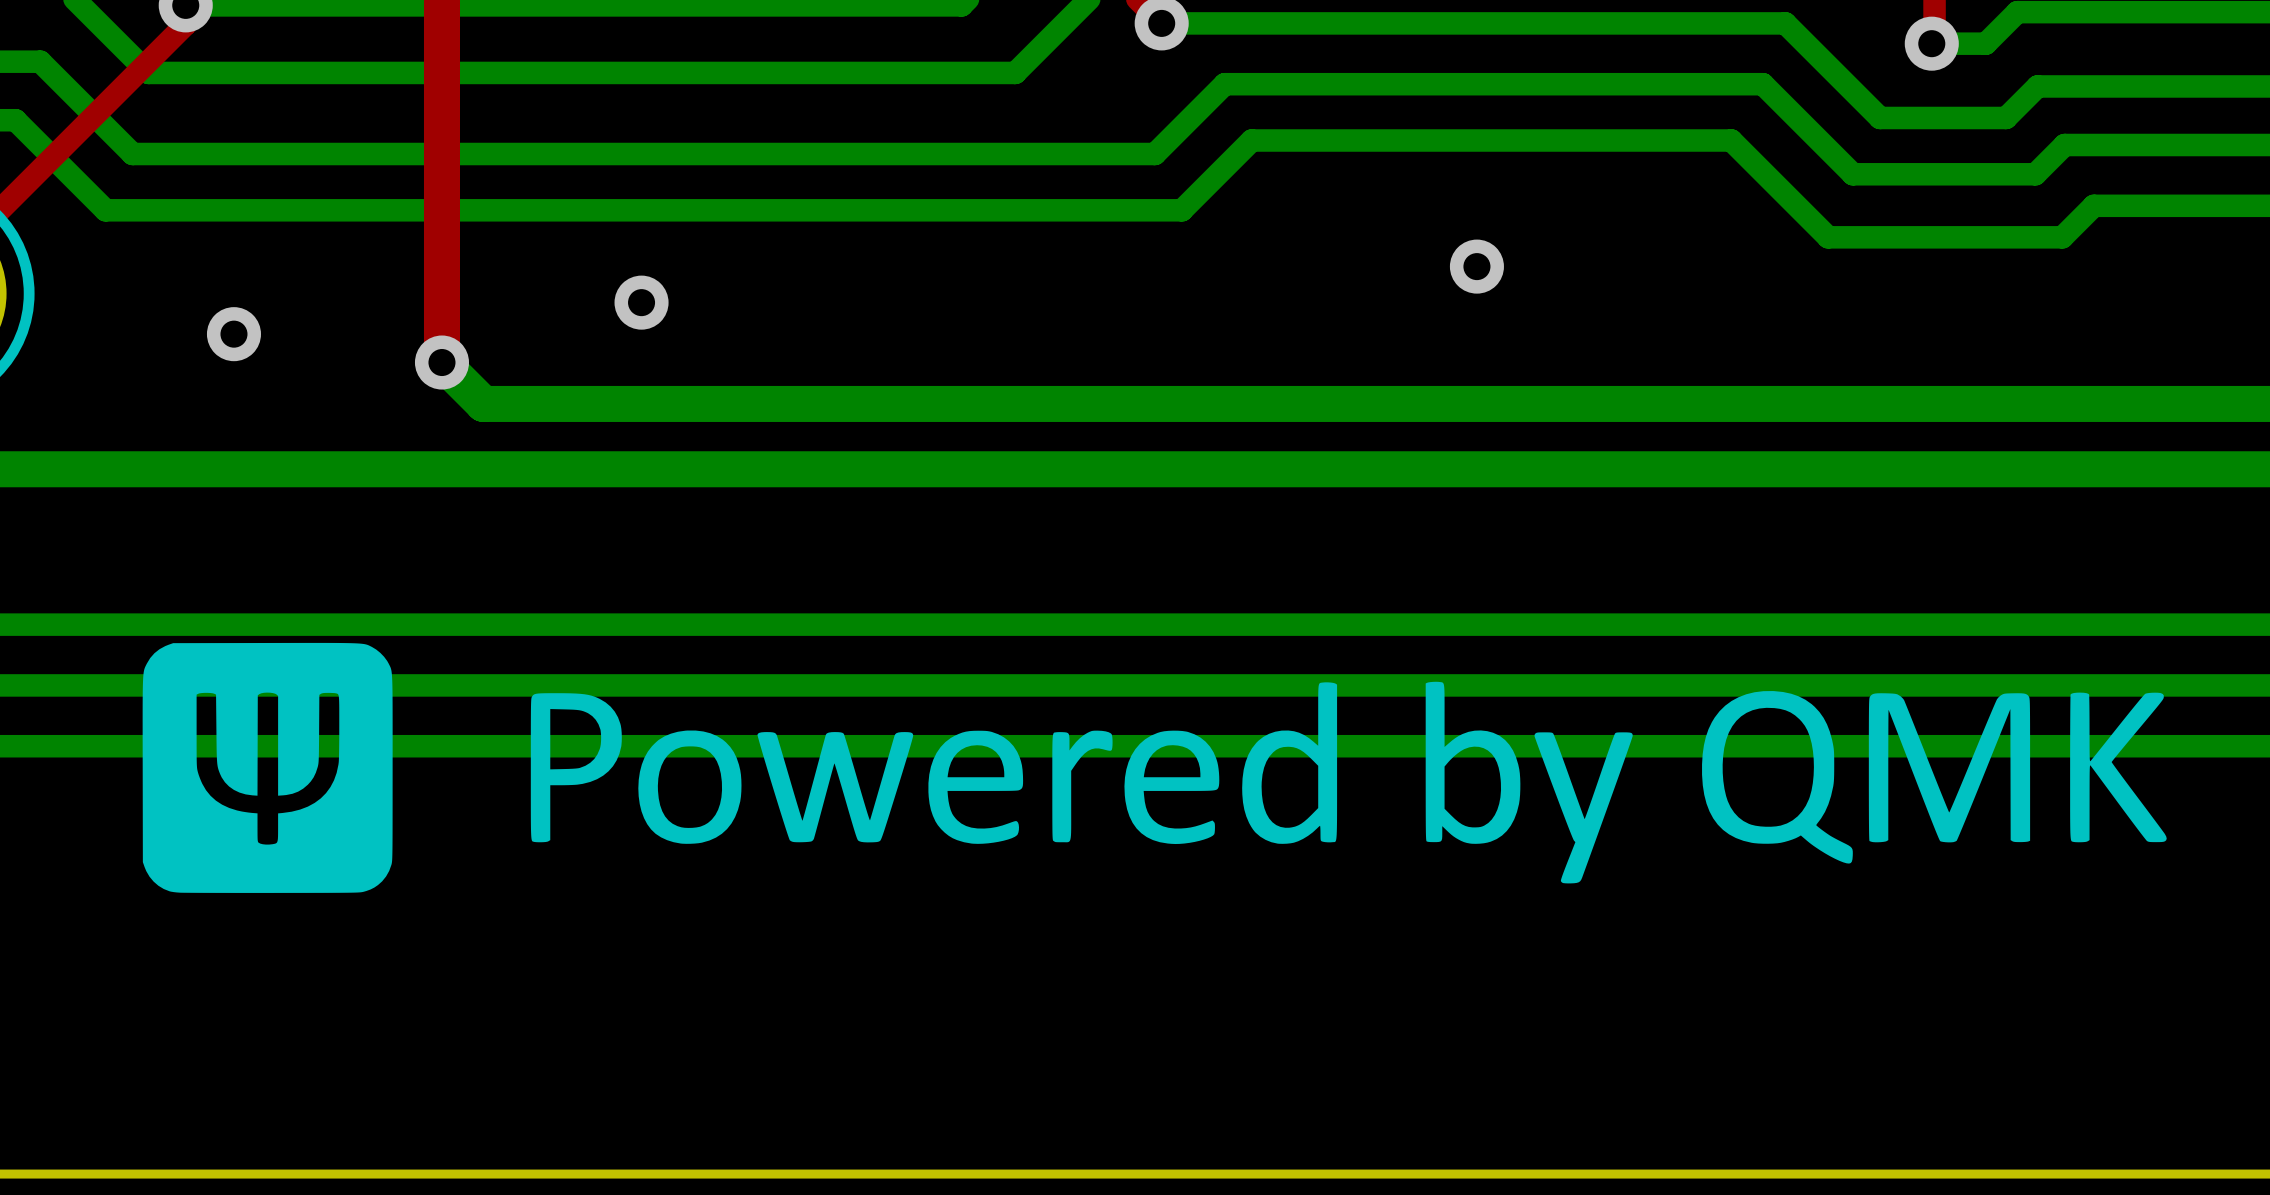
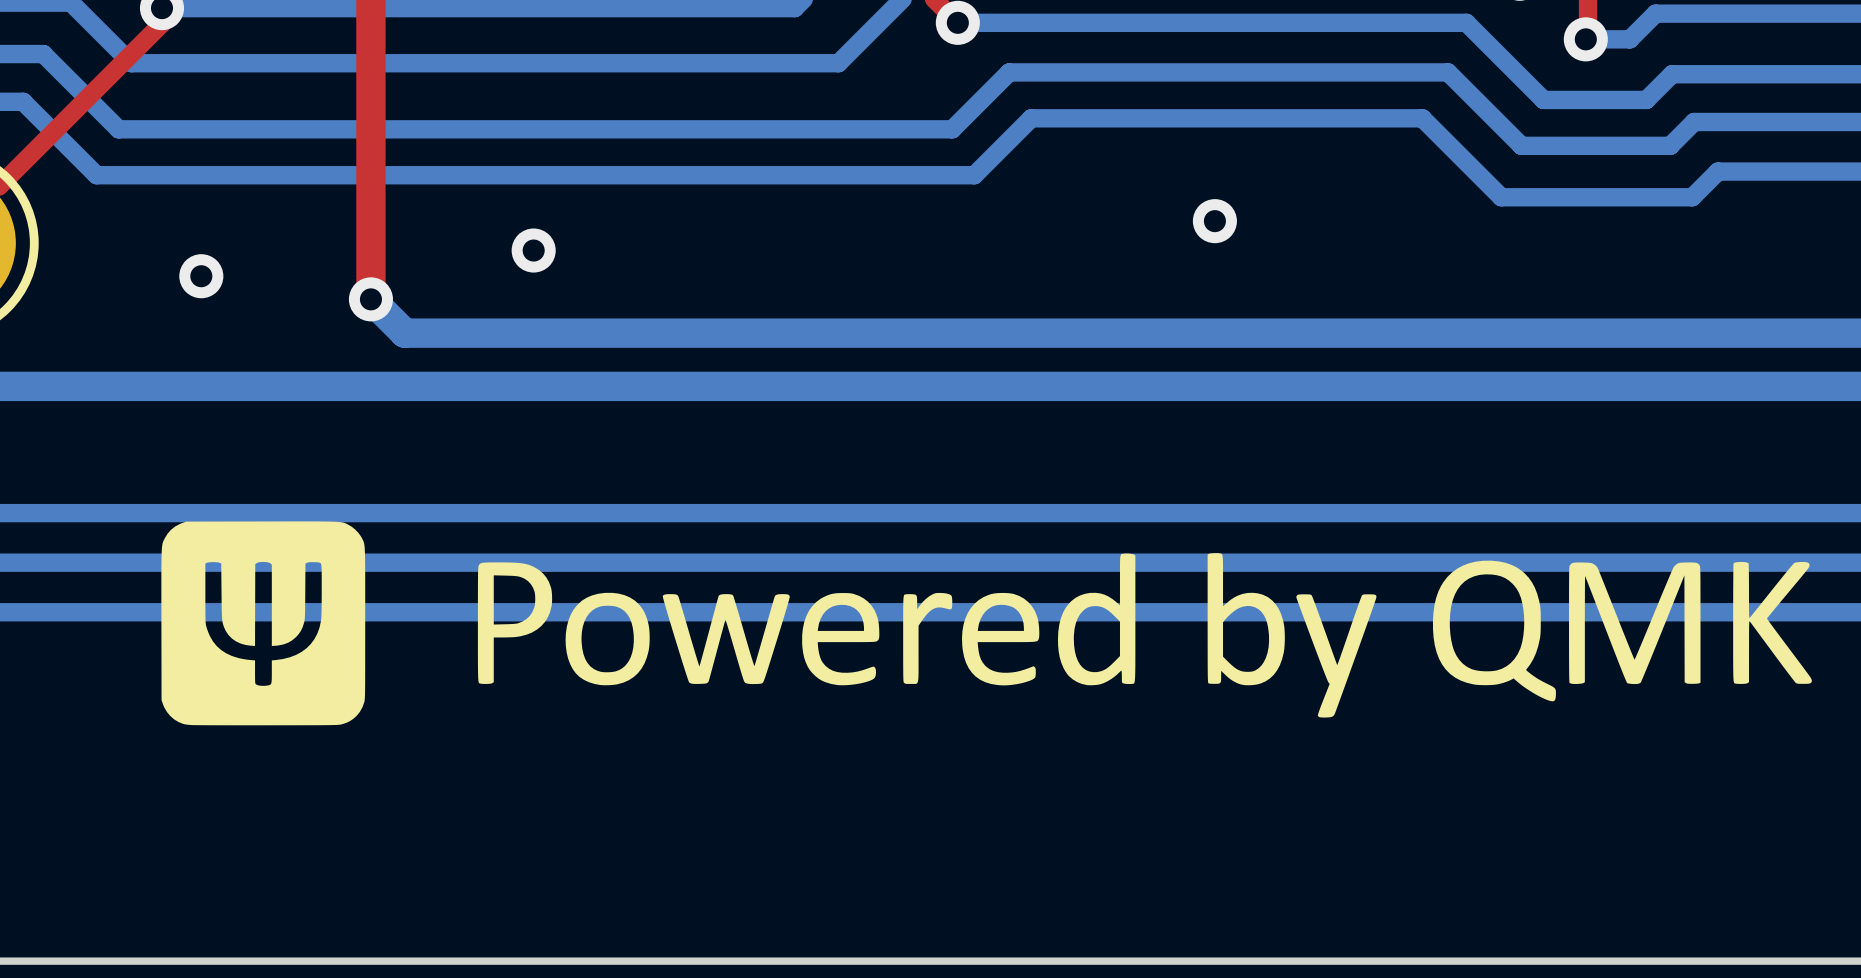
drawing position: (1154, 767) -> (986, 623)

